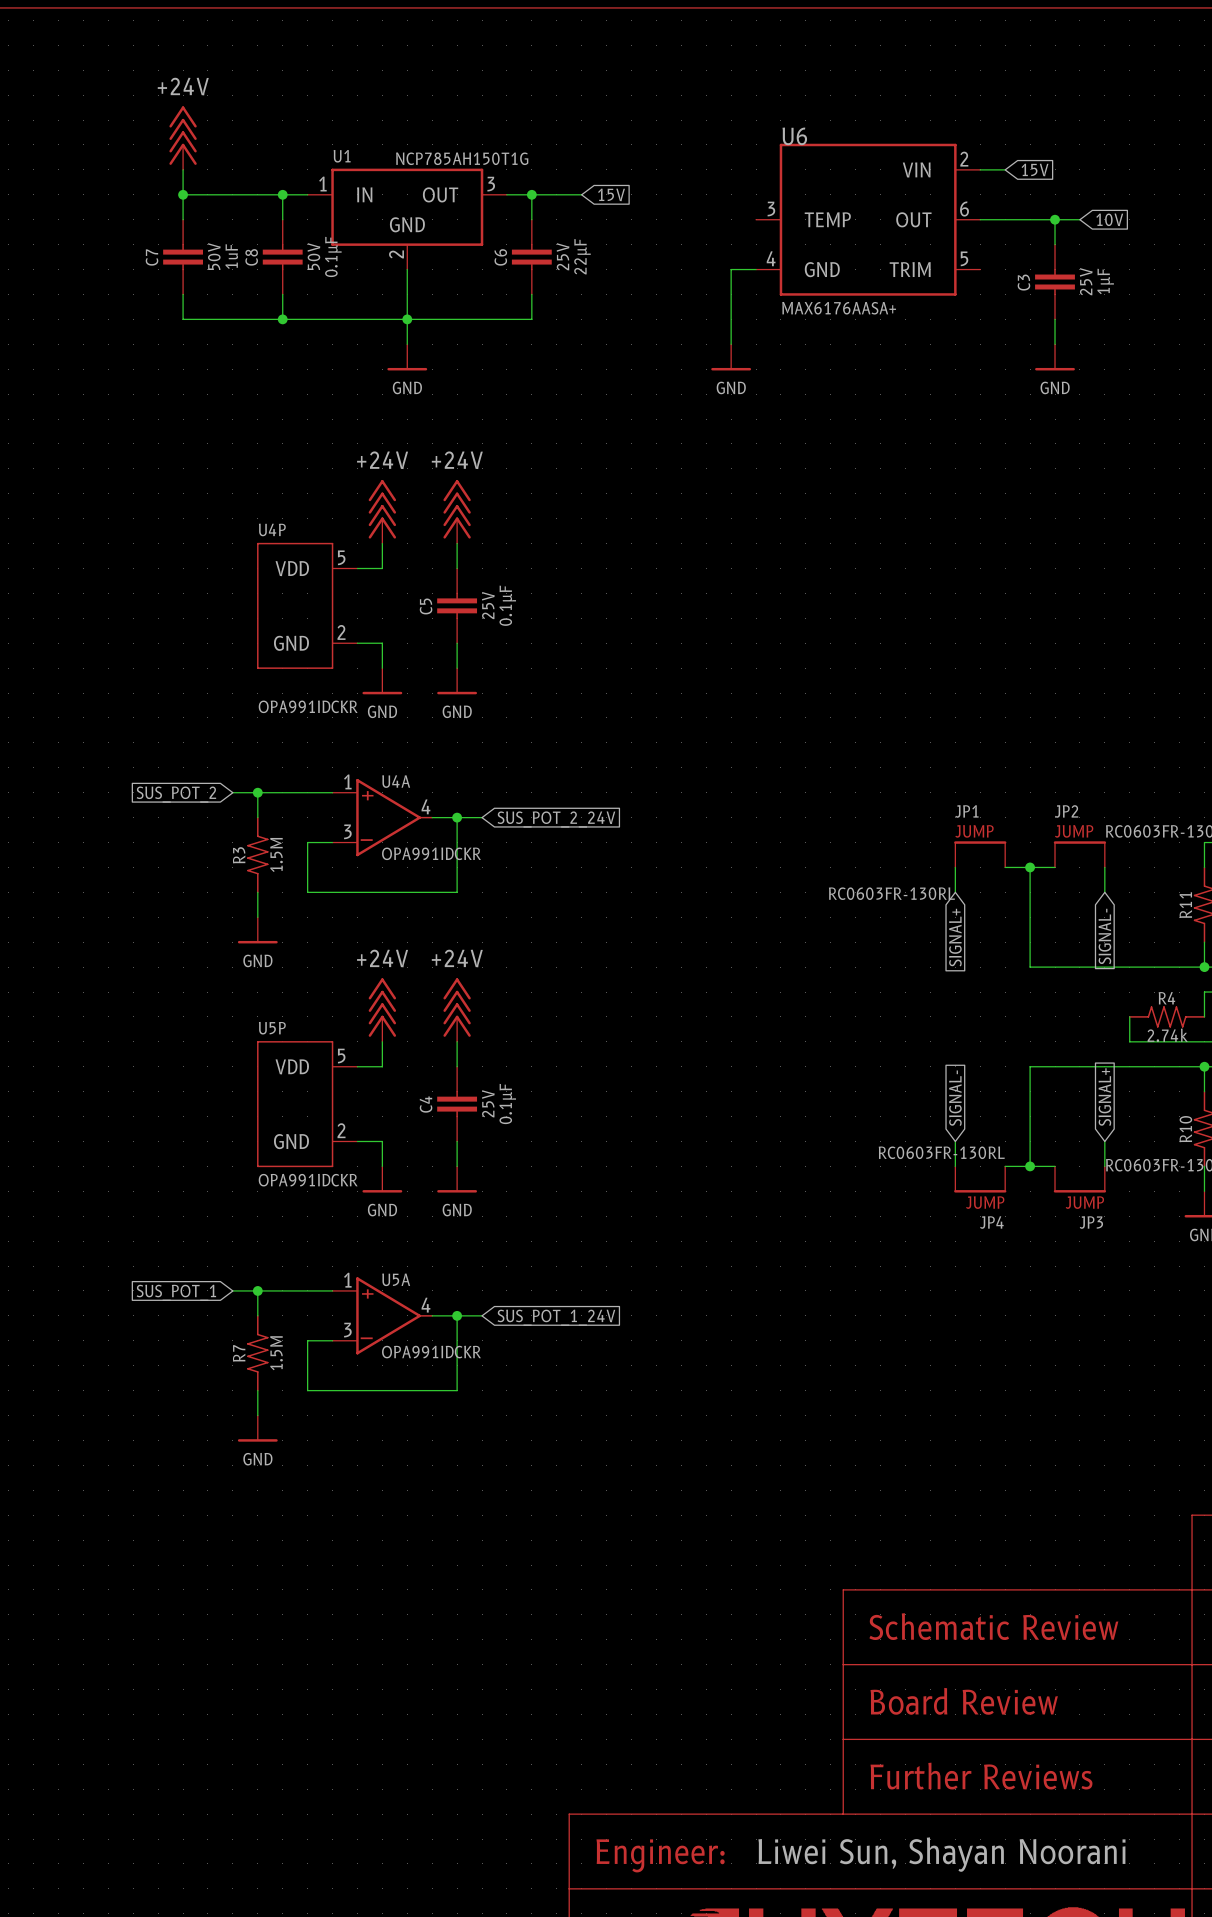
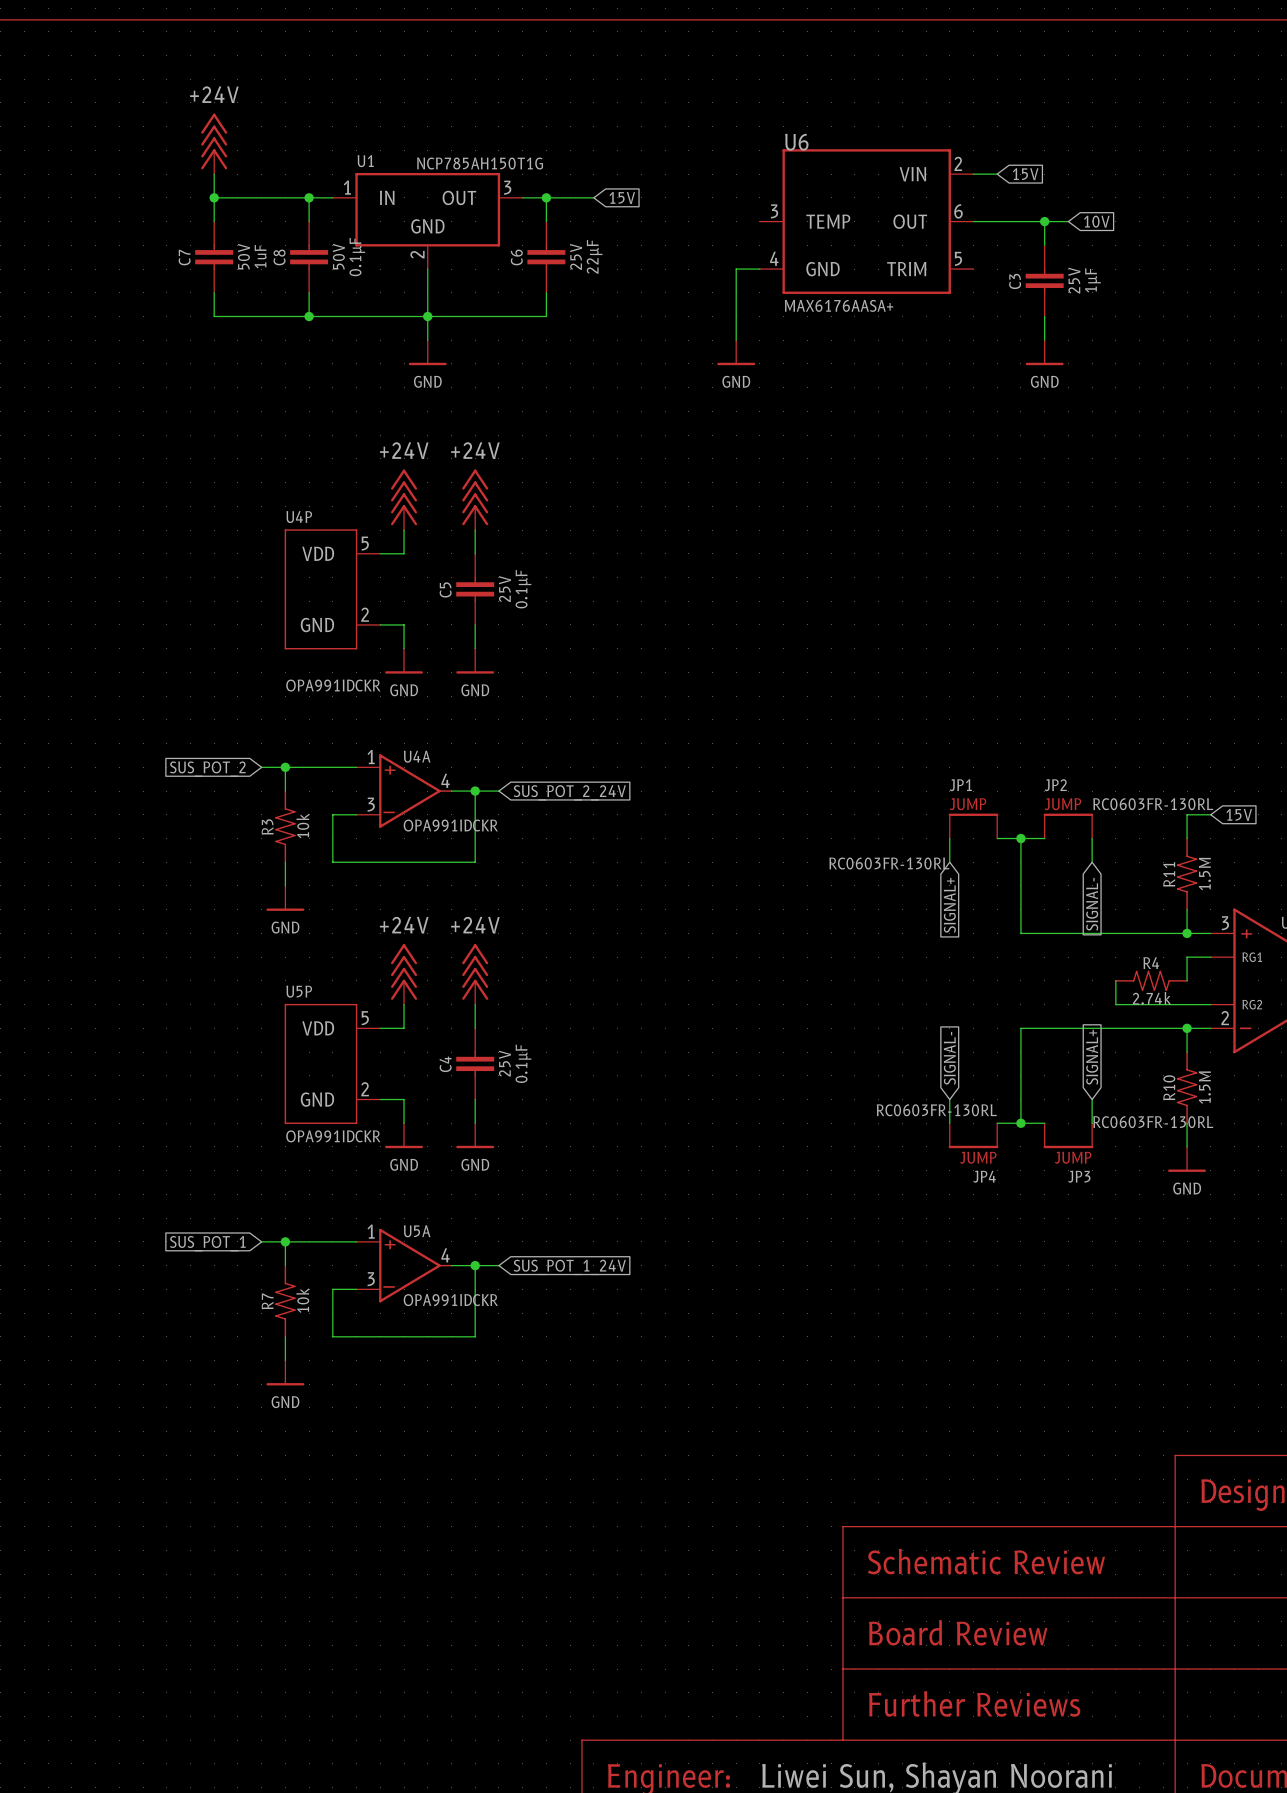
R3 text: 1.5M (276, 854) -> 10k (302, 825)
R7 text: 1.5M (276, 1353) -> 10k (302, 1300)

